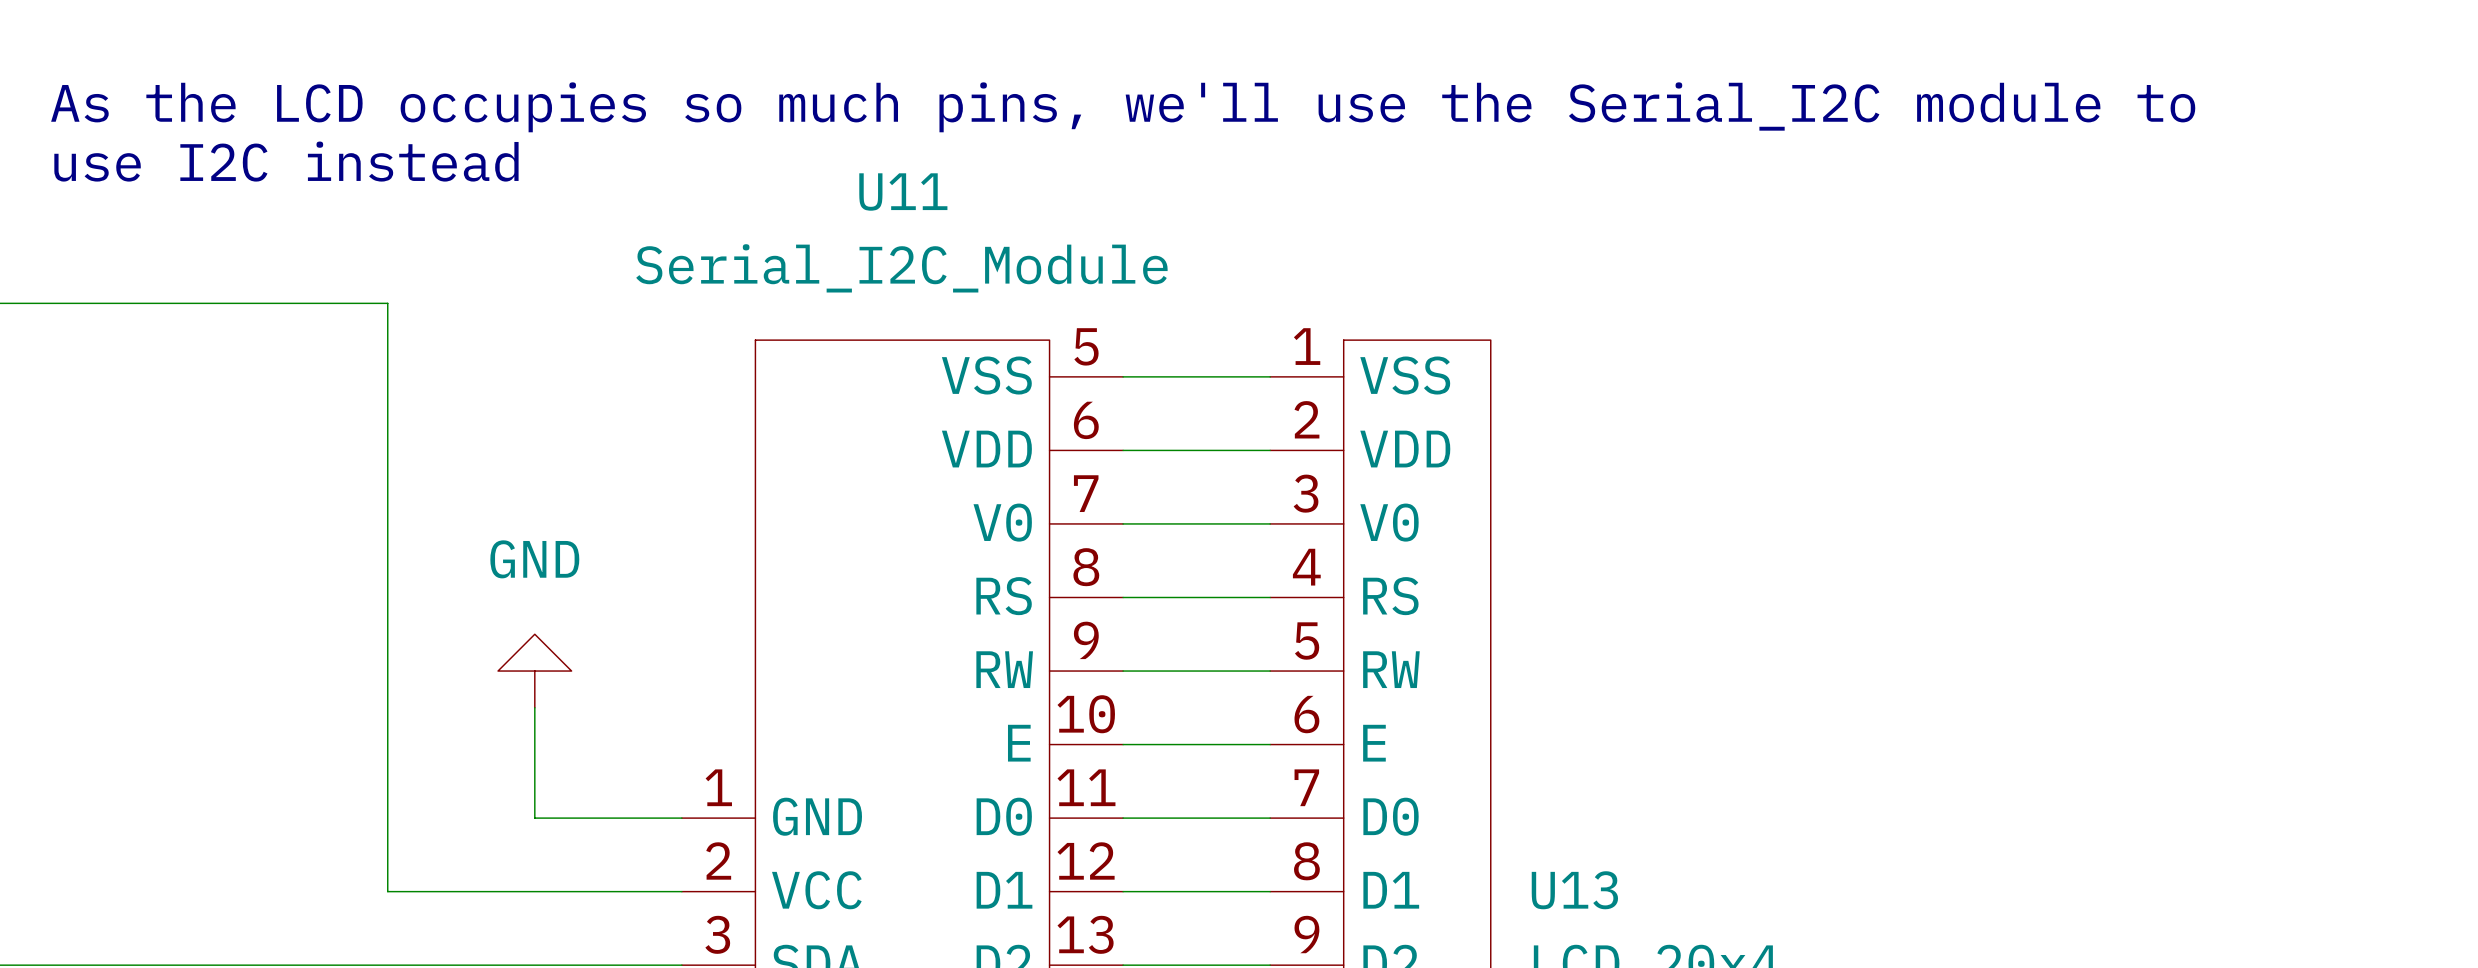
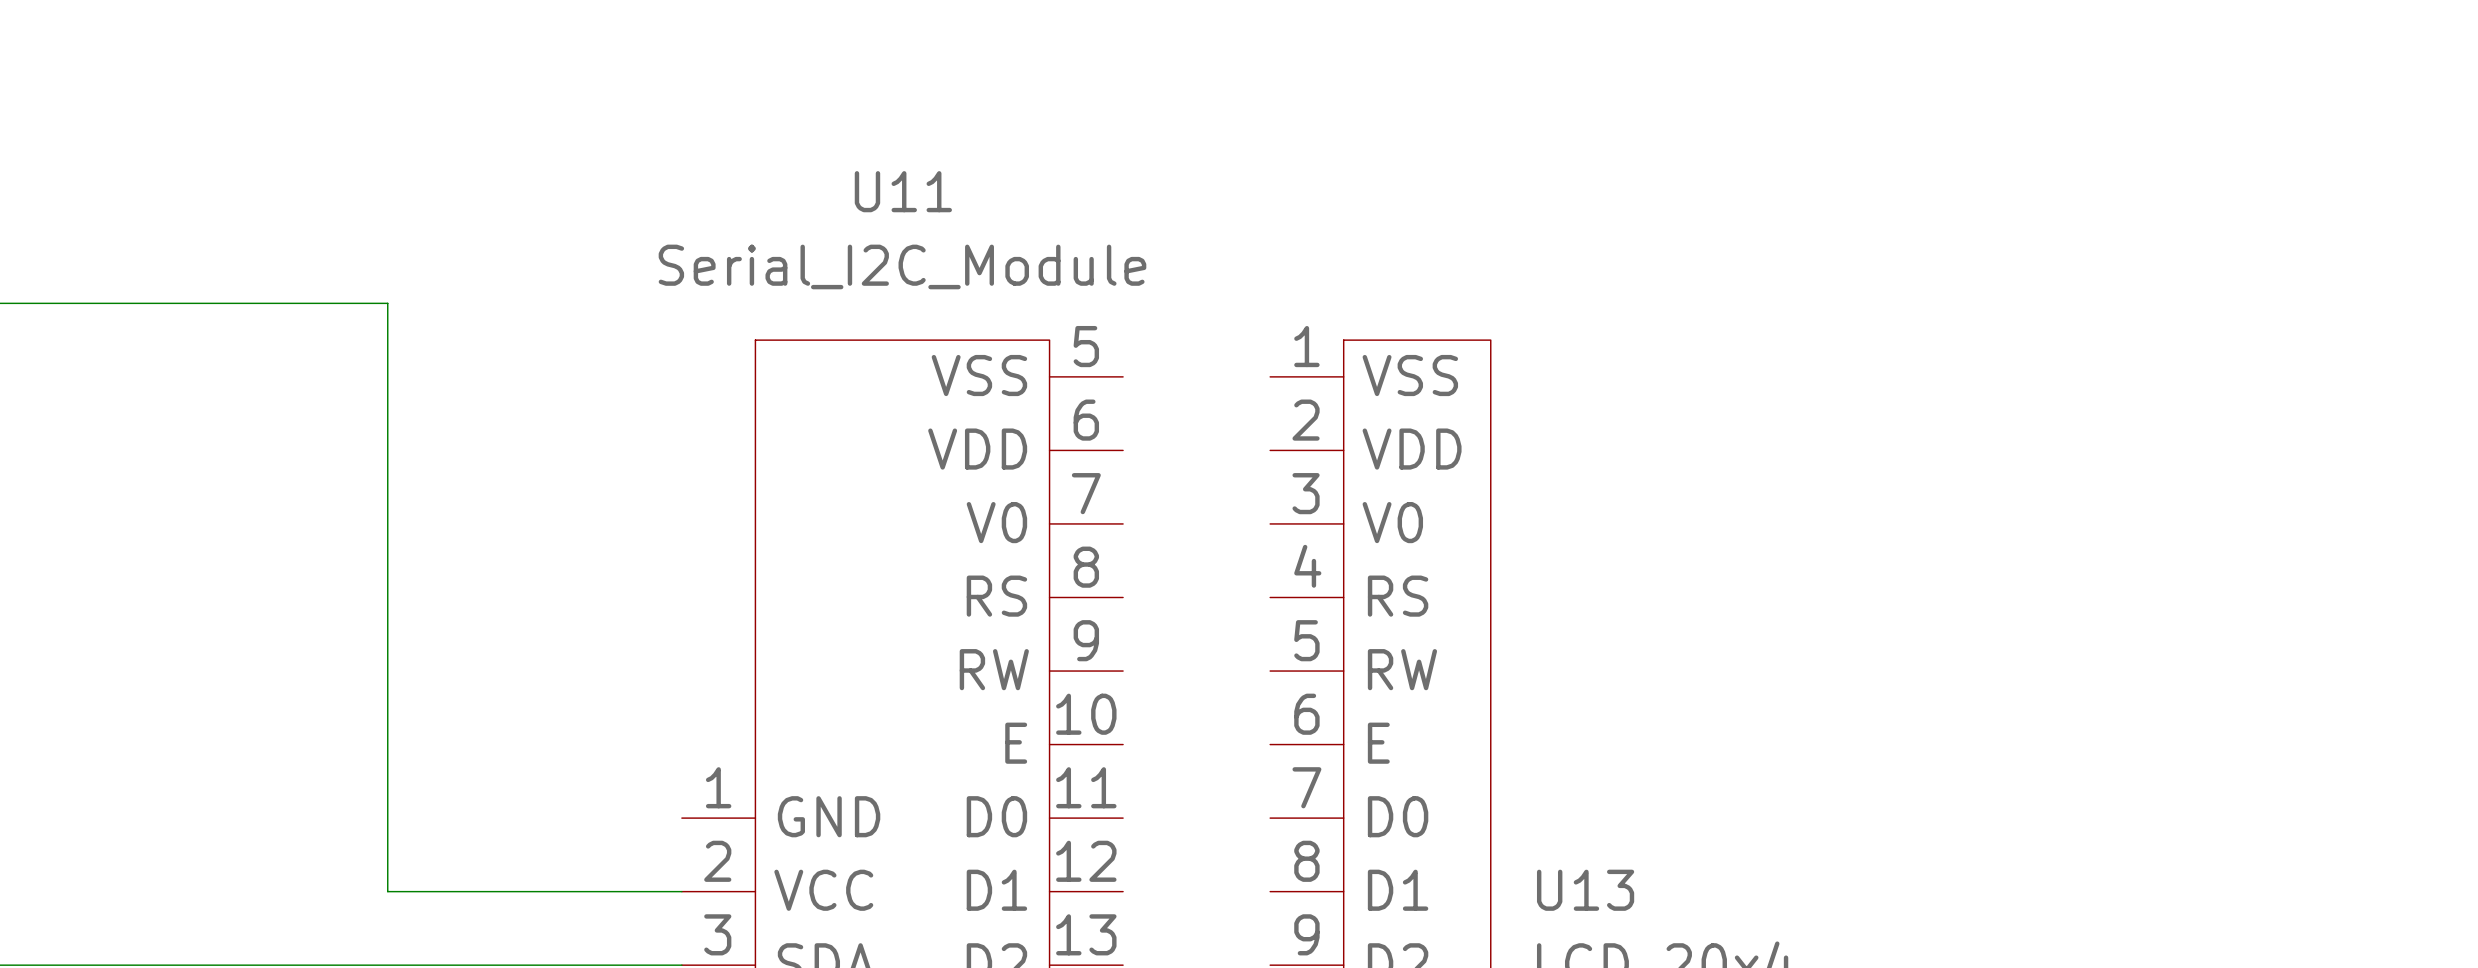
text: As the LCD occupies so much pins, we'll use the Serial_I2C module to (1123, 107) -> none
text: use I2C instead (286, 161) -> none
wire: (1123, 376) (1270, 376) -> none
wire: (1123, 450) (1270, 450) -> none
wire: (1123, 523) (1270, 523) -> none
wire: (1123, 597) (1270, 597) -> none
power symbol: GND (534, 671) -> none
wire: (1123, 671) (1270, 671) -> none
wire: (534, 707) (534, 818) (681, 818) -> none
wire: (1123, 744) (1270, 744) -> none
wire: (1123, 818) (1270, 818) -> none
wire: (1123, 891) (1270, 891) -> none
wire: (1123, 965) (1270, 965) -> none

